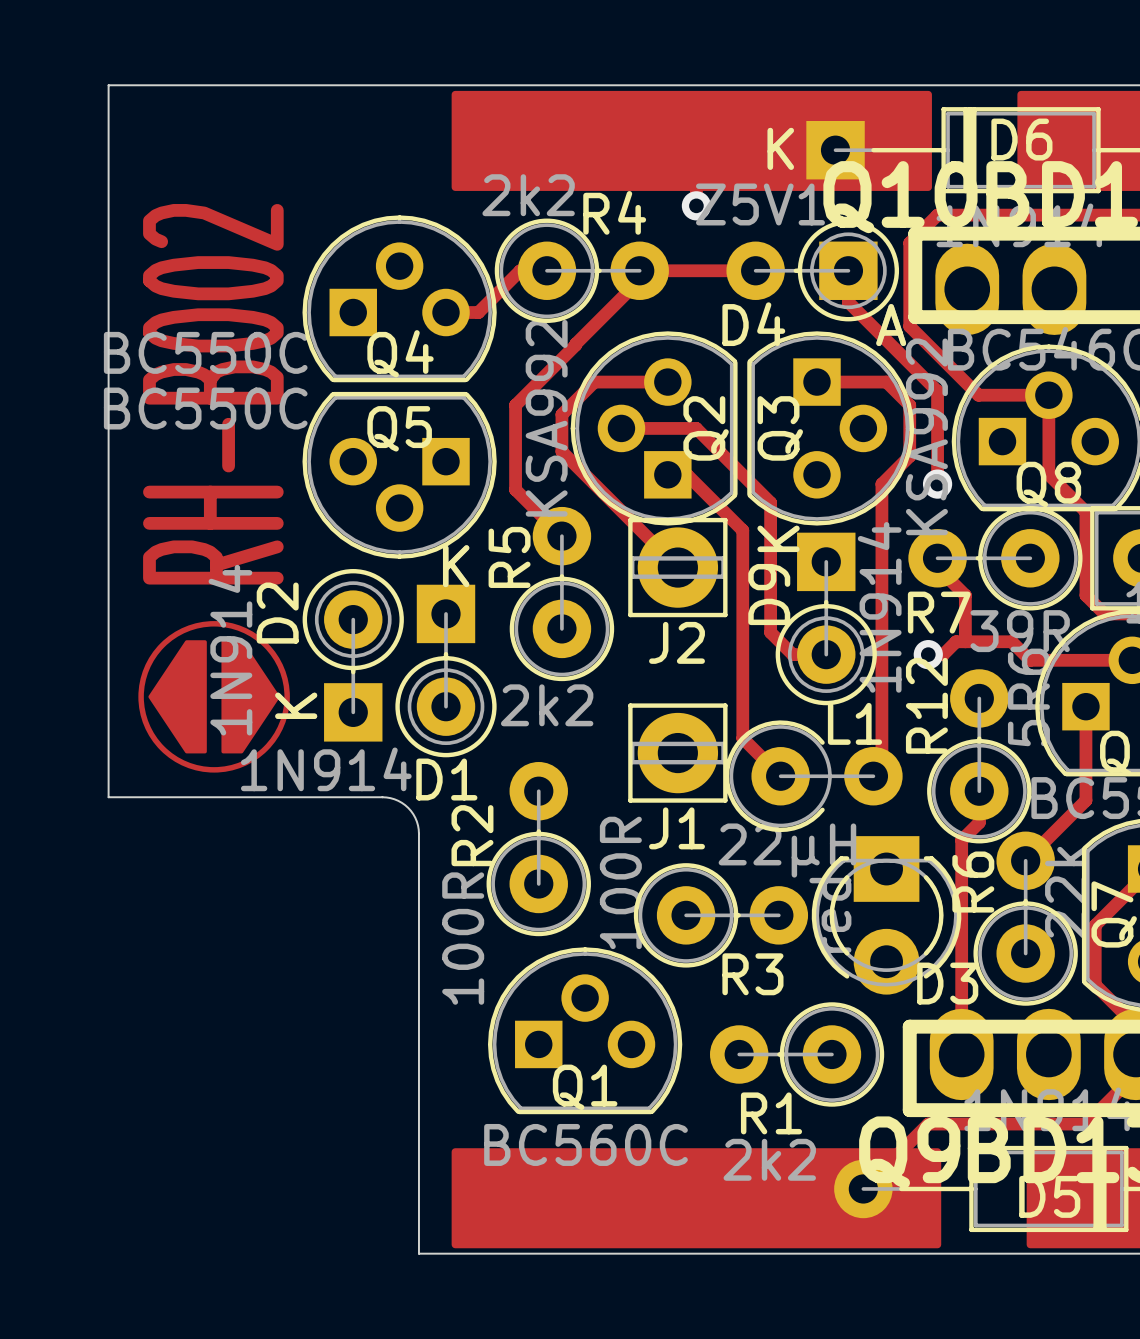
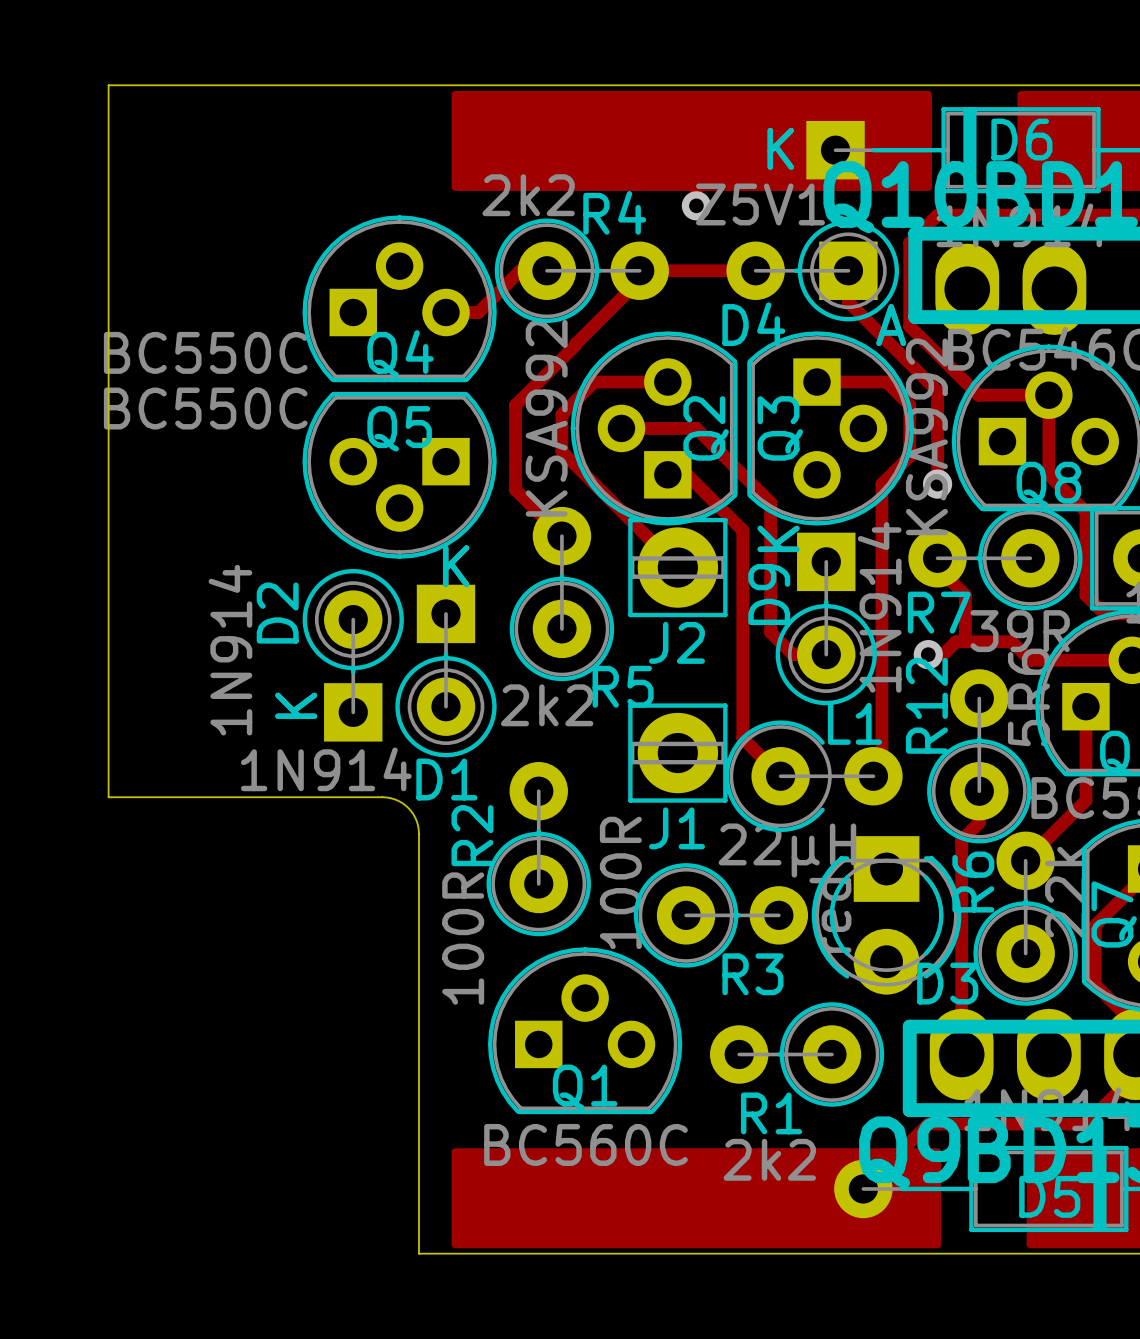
text: RH-B002 (213, 394) -> none
R5 name rotation: 0° (509, 557) -> 90° clockwise (623, 686)
R5 name position: R5 (509, 557) -> R5 (623, 686)
drawing: [138, 621, 290, 773] -> none

